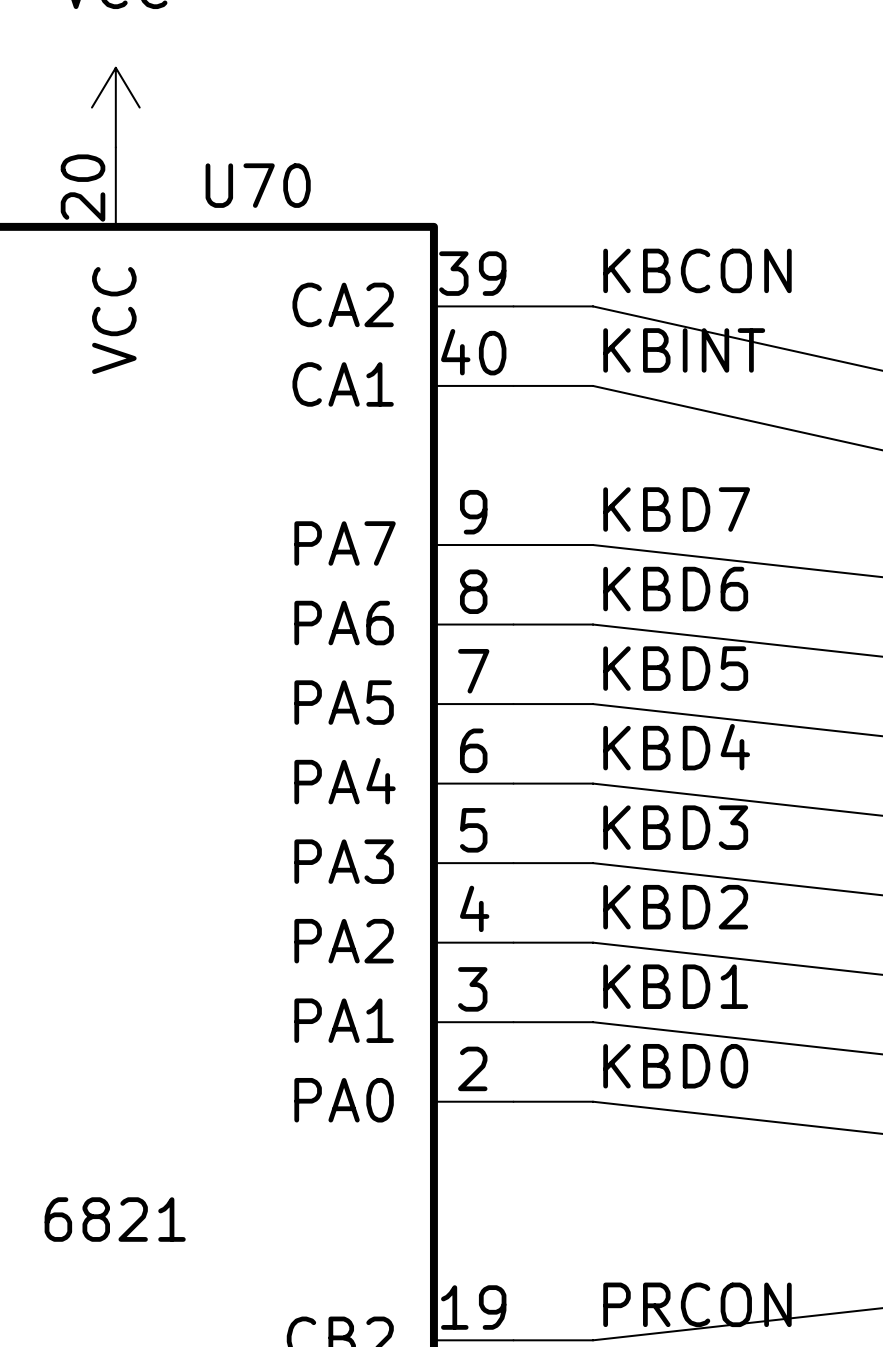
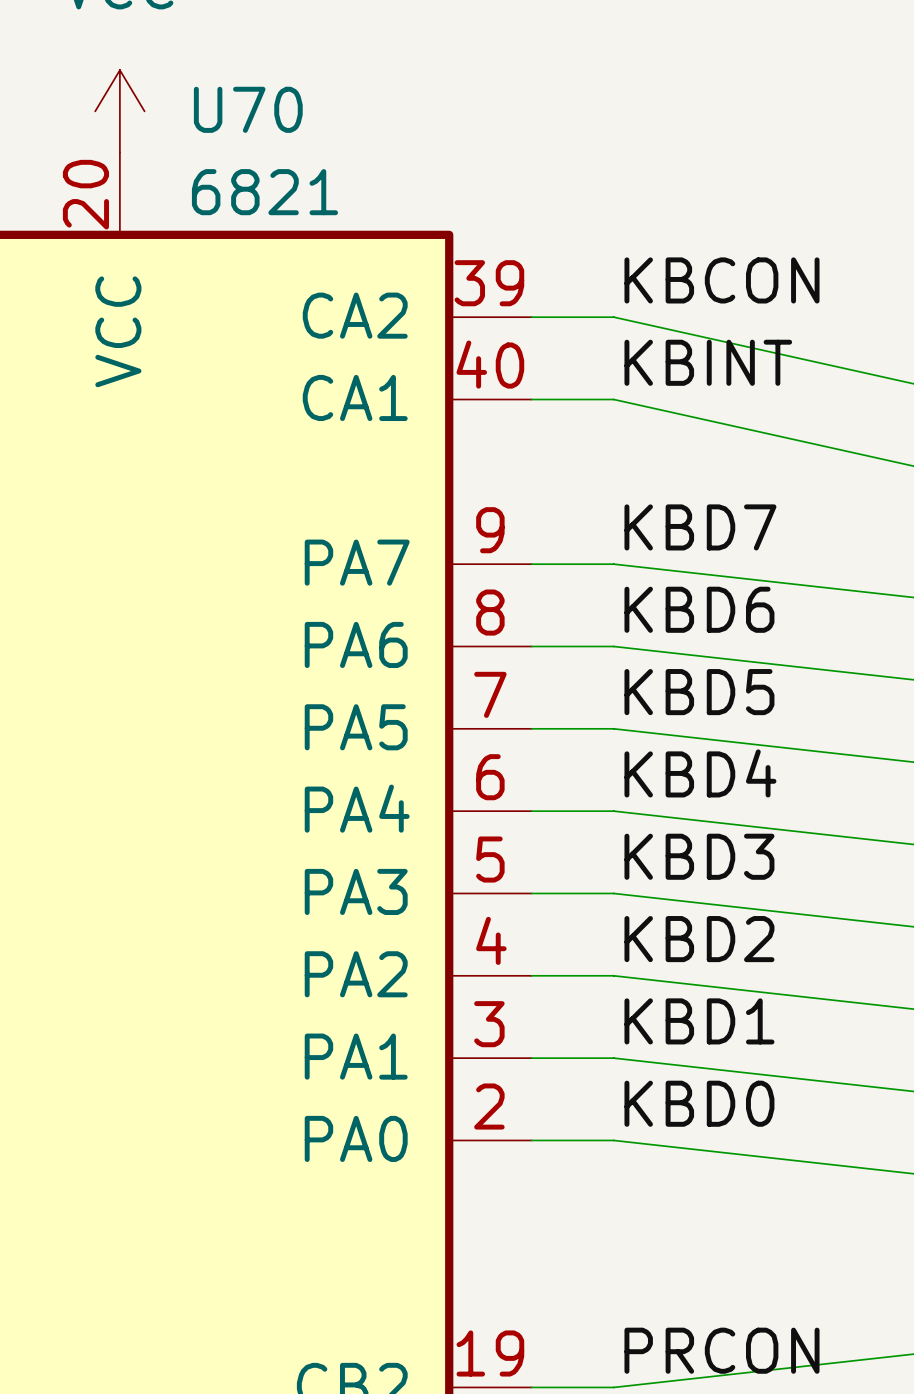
U70 name position: U70 (258, 185) -> U70 (248, 109)
U70 value position: 6821 (115, 1219) -> 6821 (264, 192)

